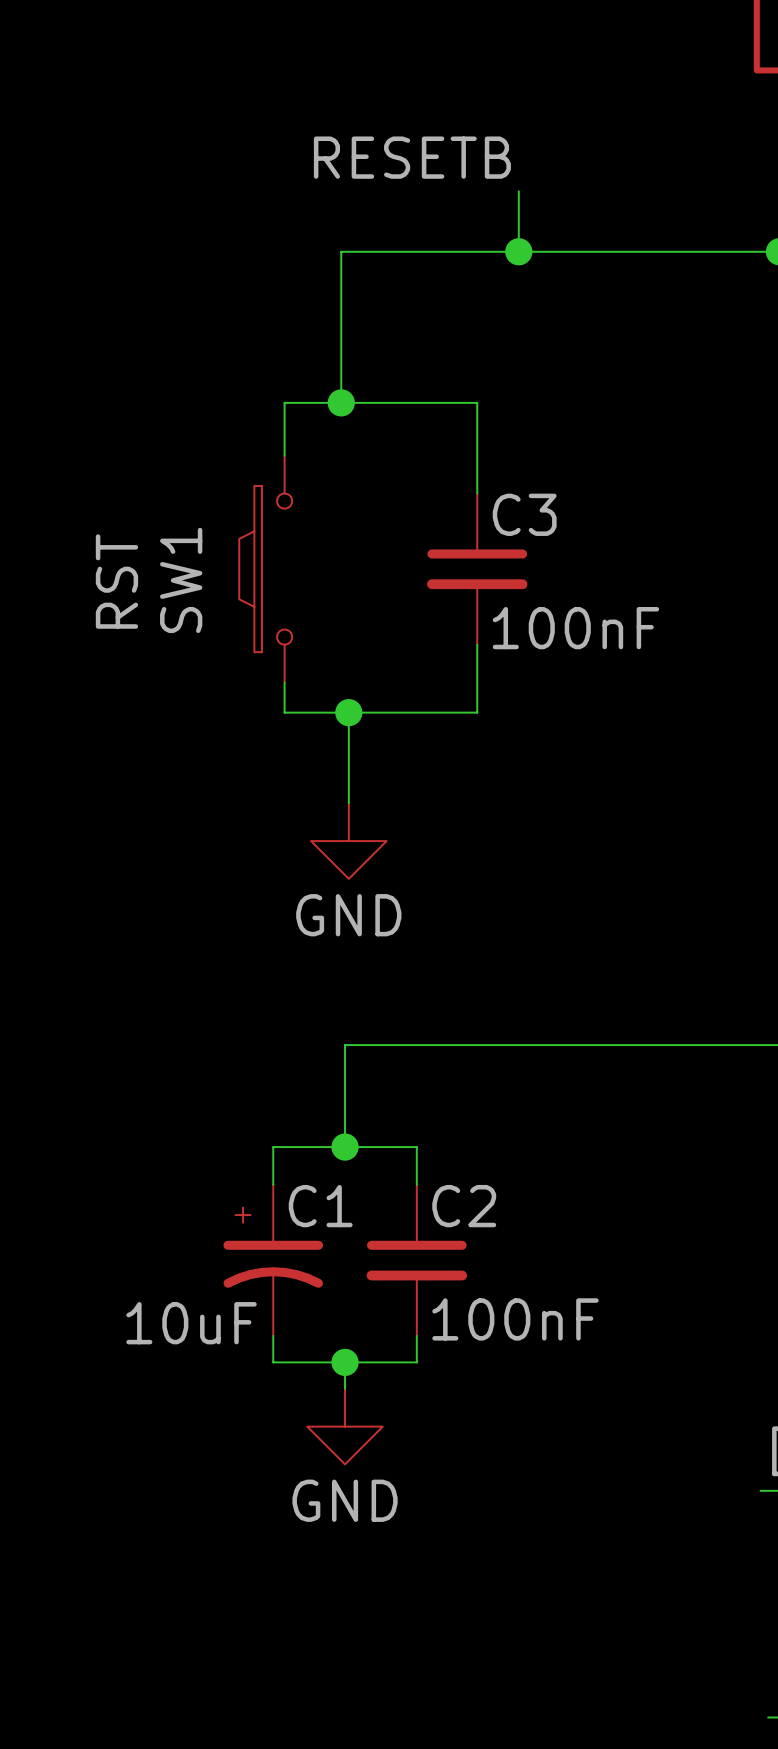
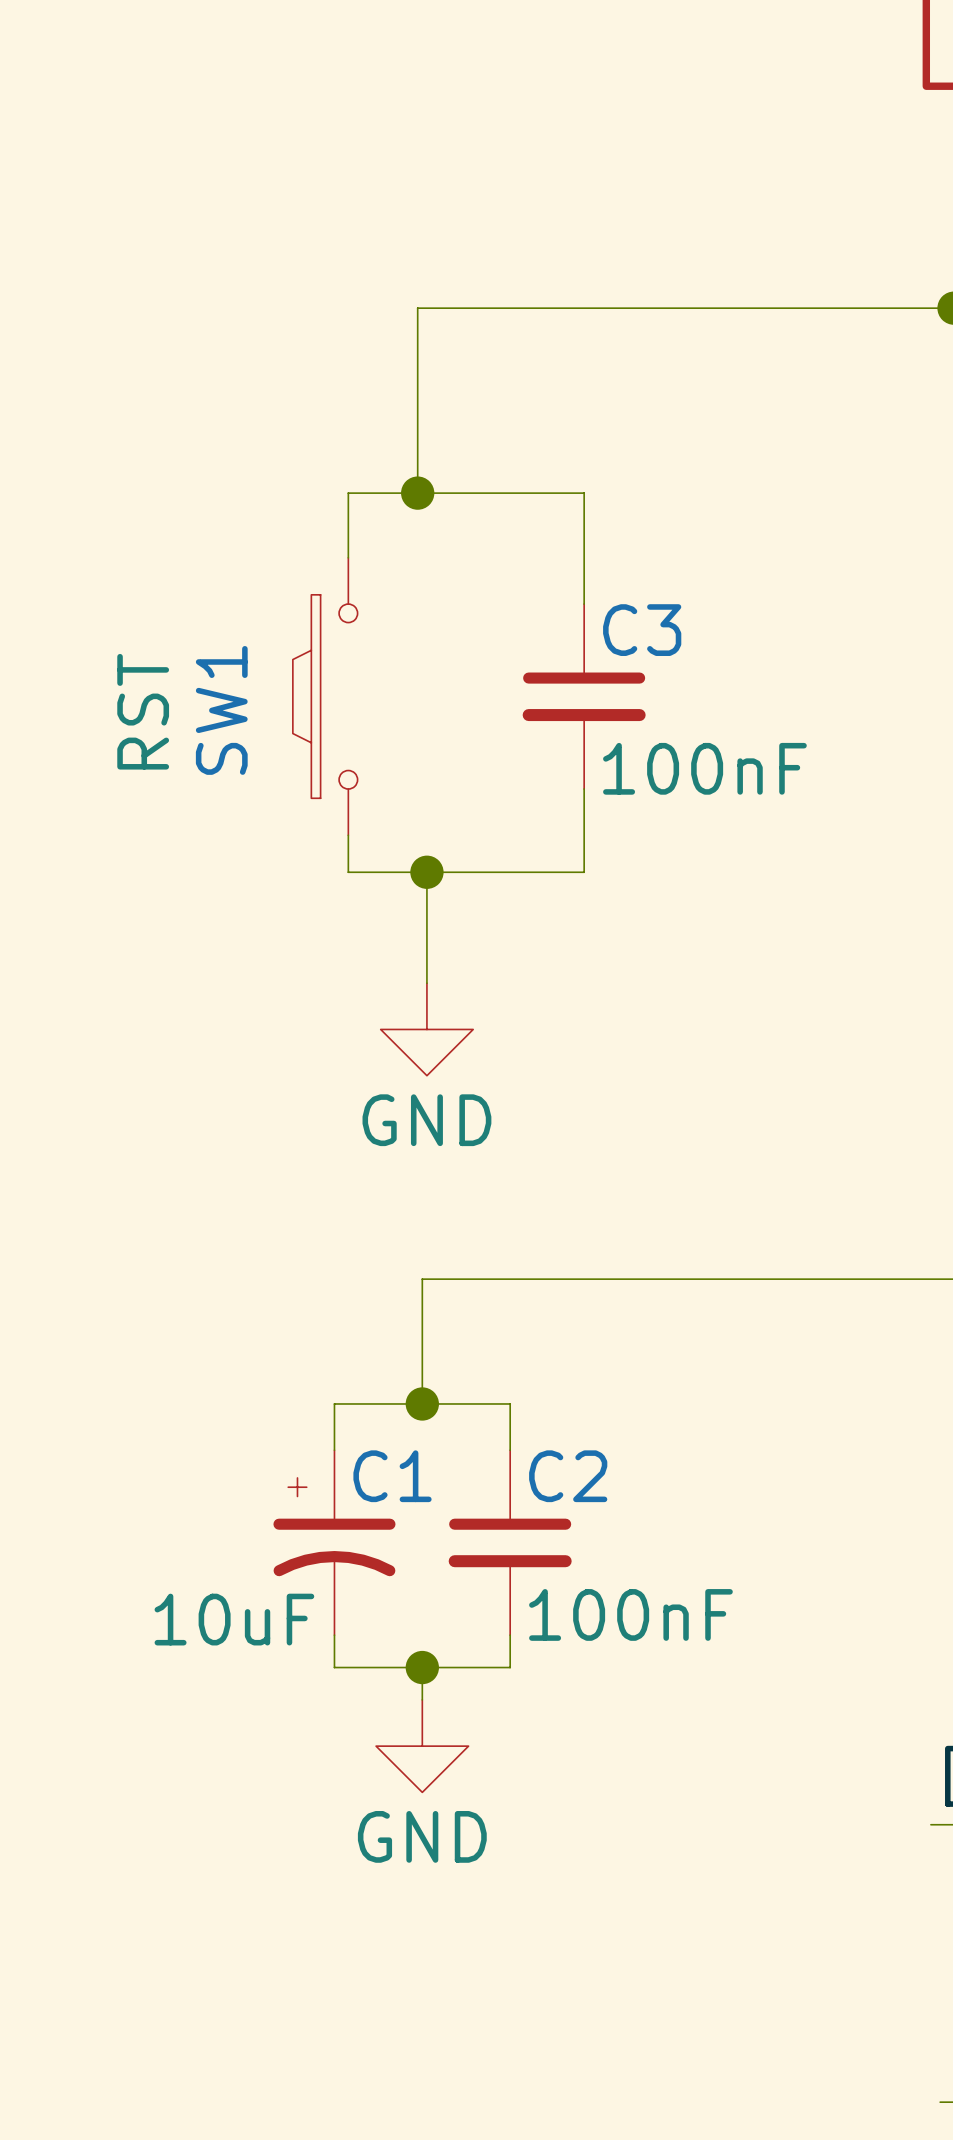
label: RESETB (412, 157) -> none
wire: (518, 191) (518, 251) -> none
junction: (518, 251) -> none

